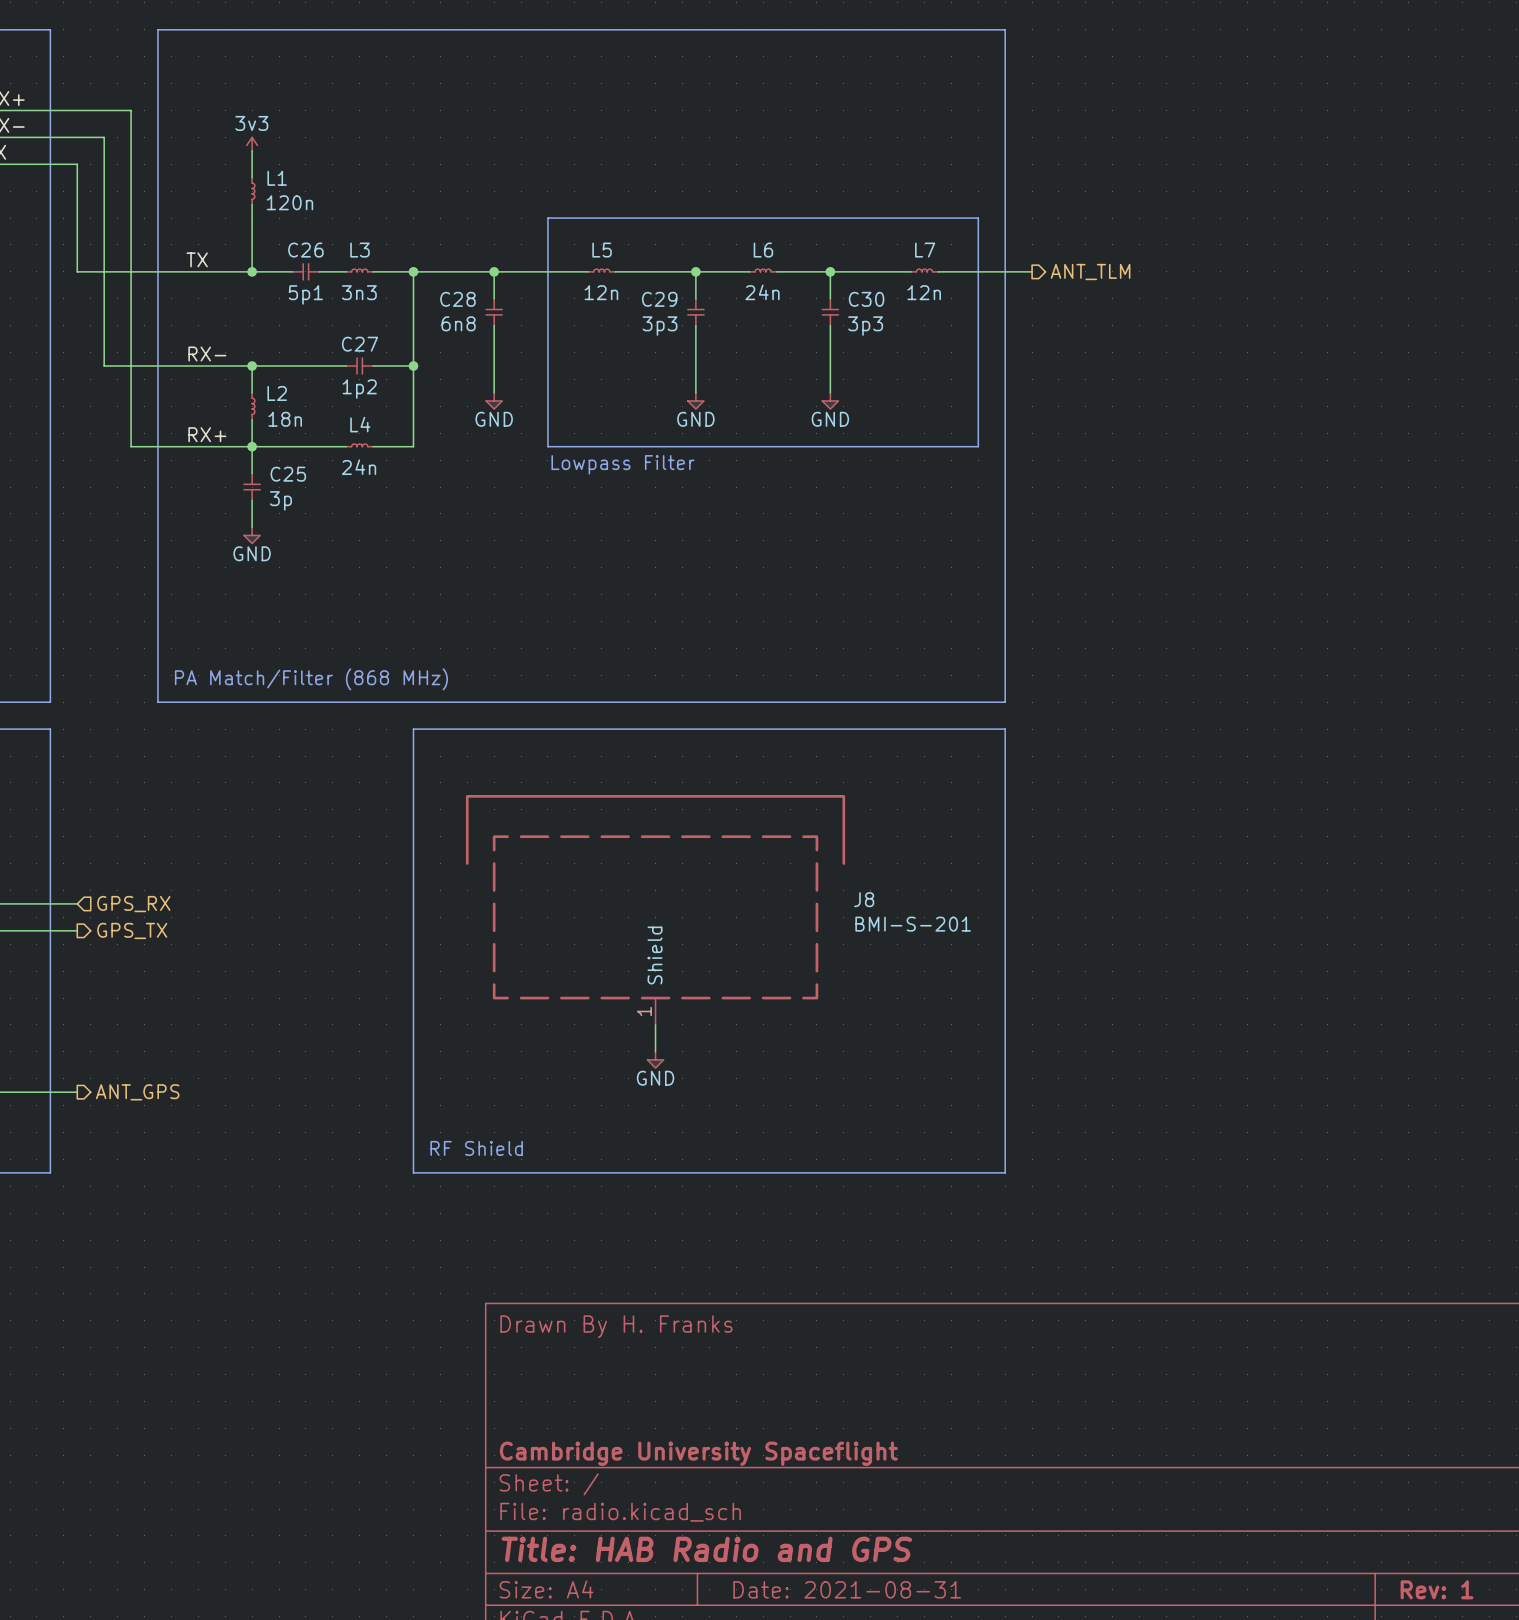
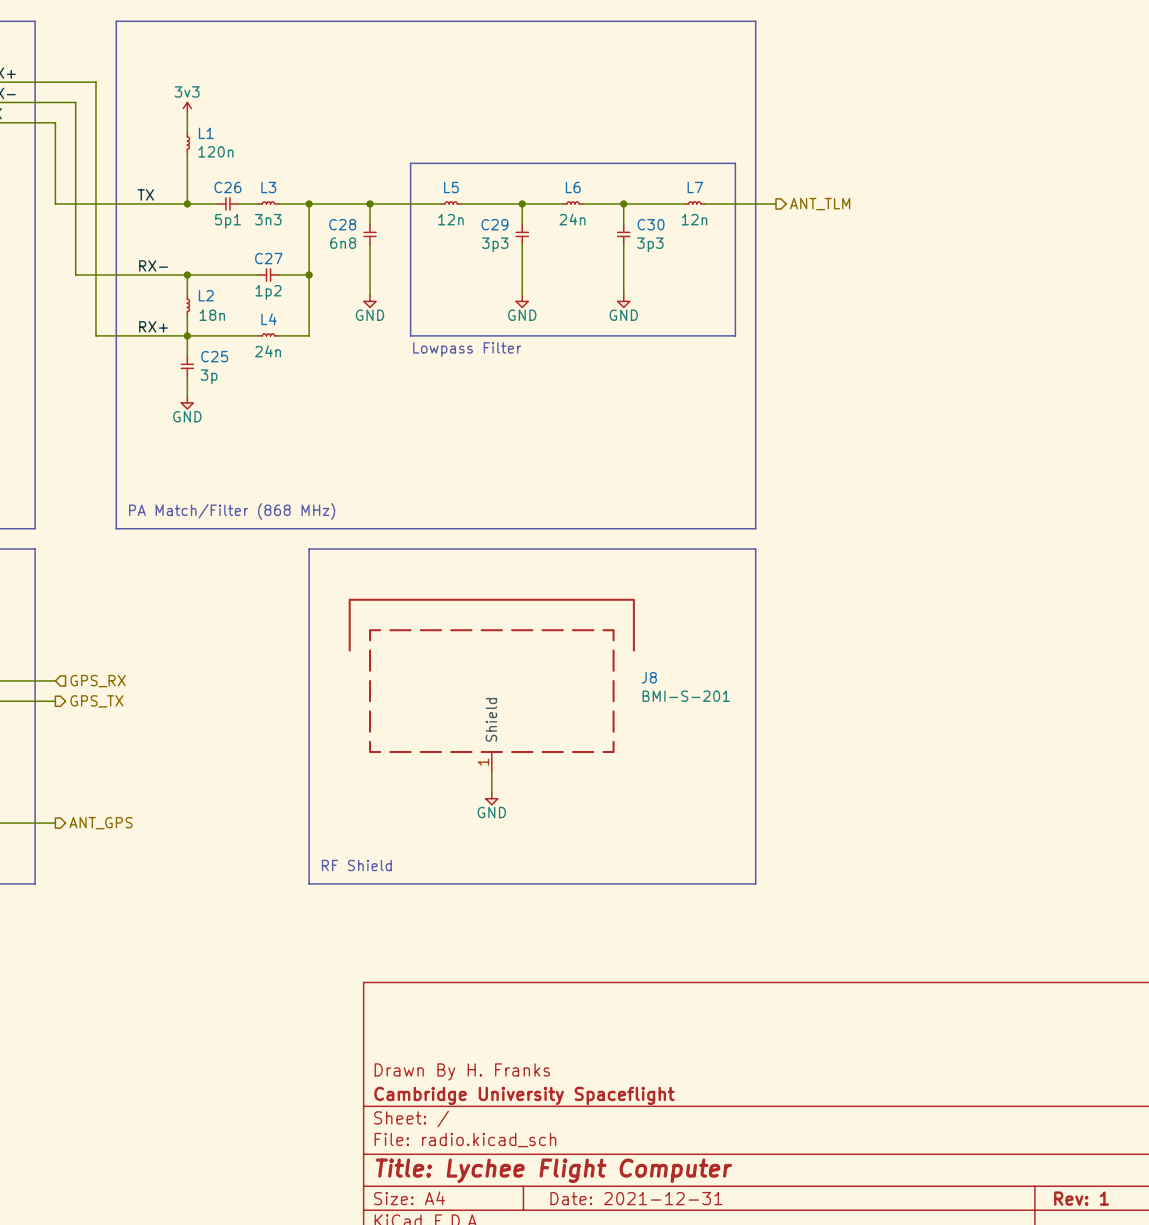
title block position: Drawn By H. Franks (616, 1326) -> Drawn By H. Franks (462, 1071)
title block: Title: HAB Radio and GPS (706, 1549) -> Title: Lychee Flight Computer (553, 1170)
title block: Date: 2021-08-31 (847, 1589) -> Date: 2021-12-31 (636, 1198)

